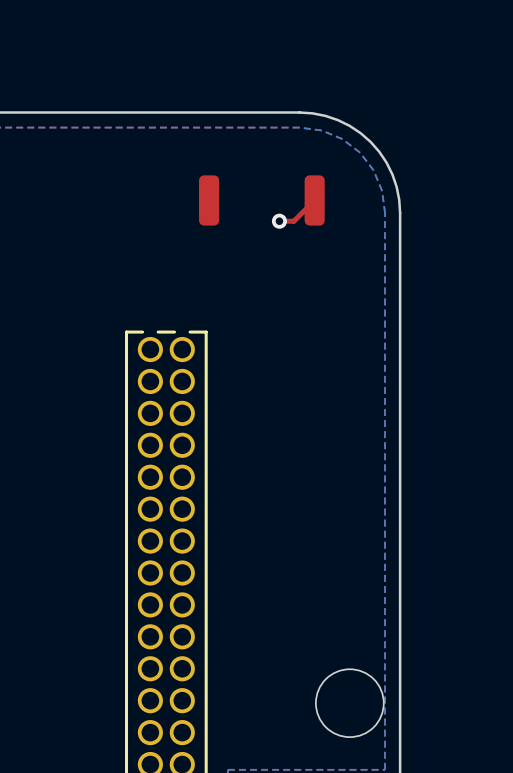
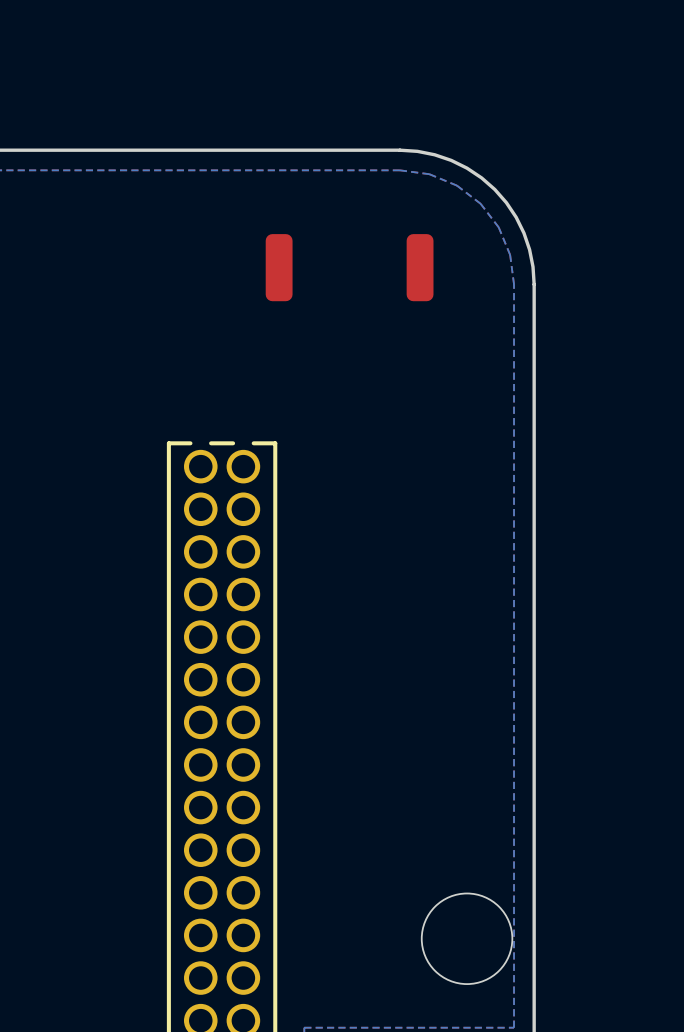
top track: (314, 200) (293, 221) (279, 221) -> none
via: (279, 221) -> none

